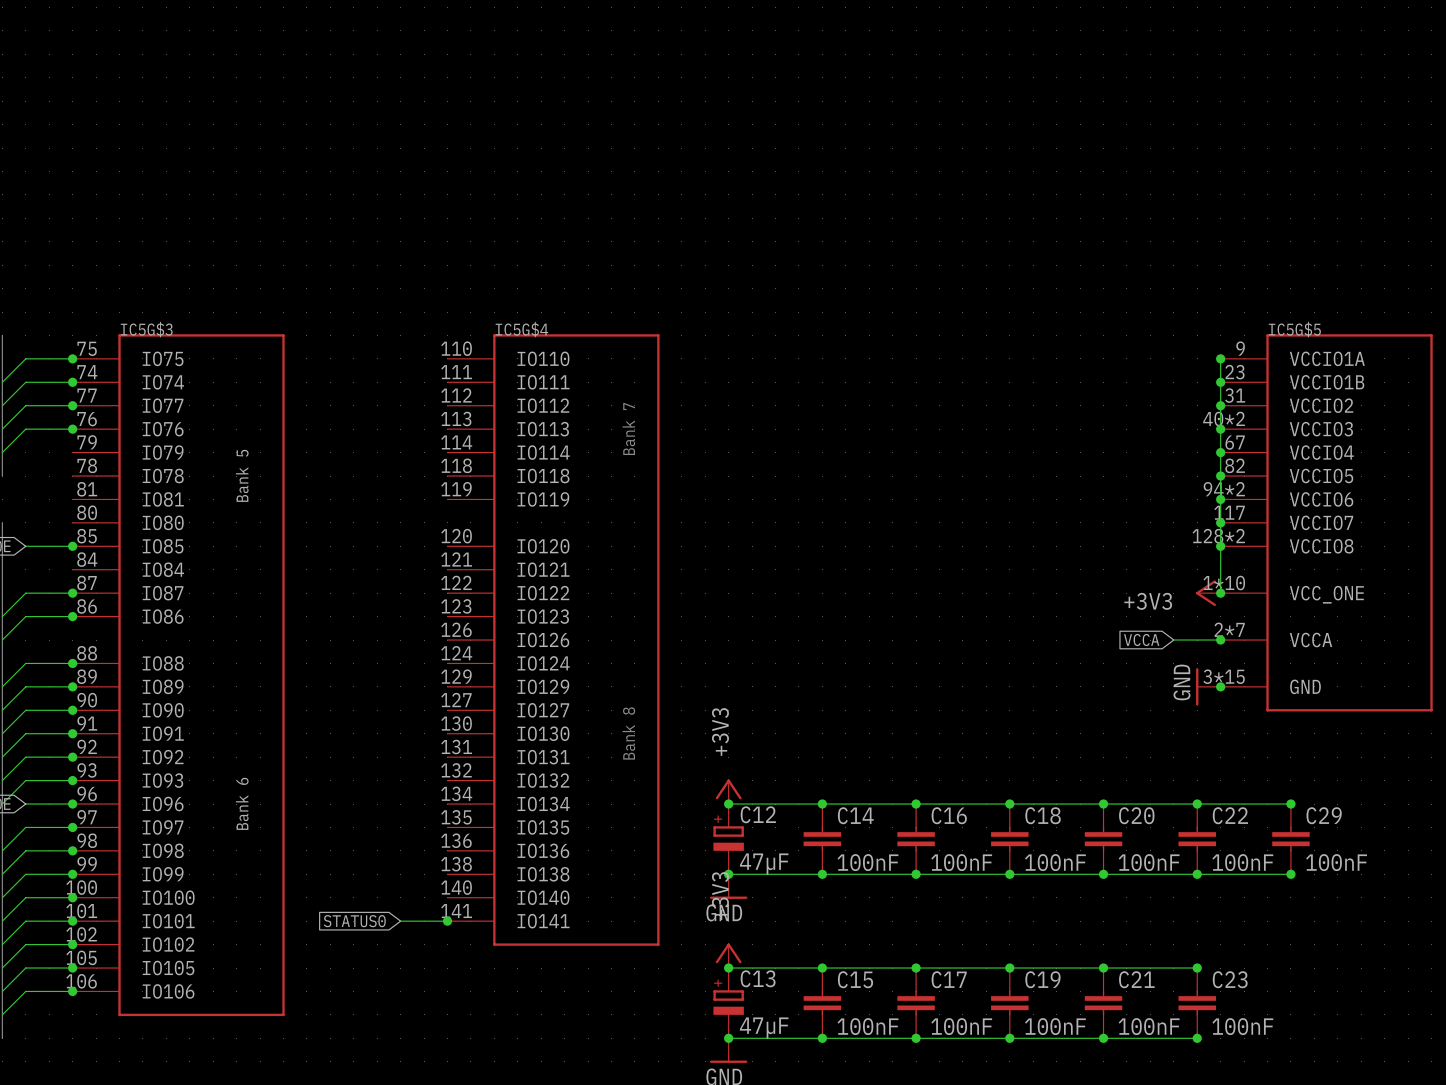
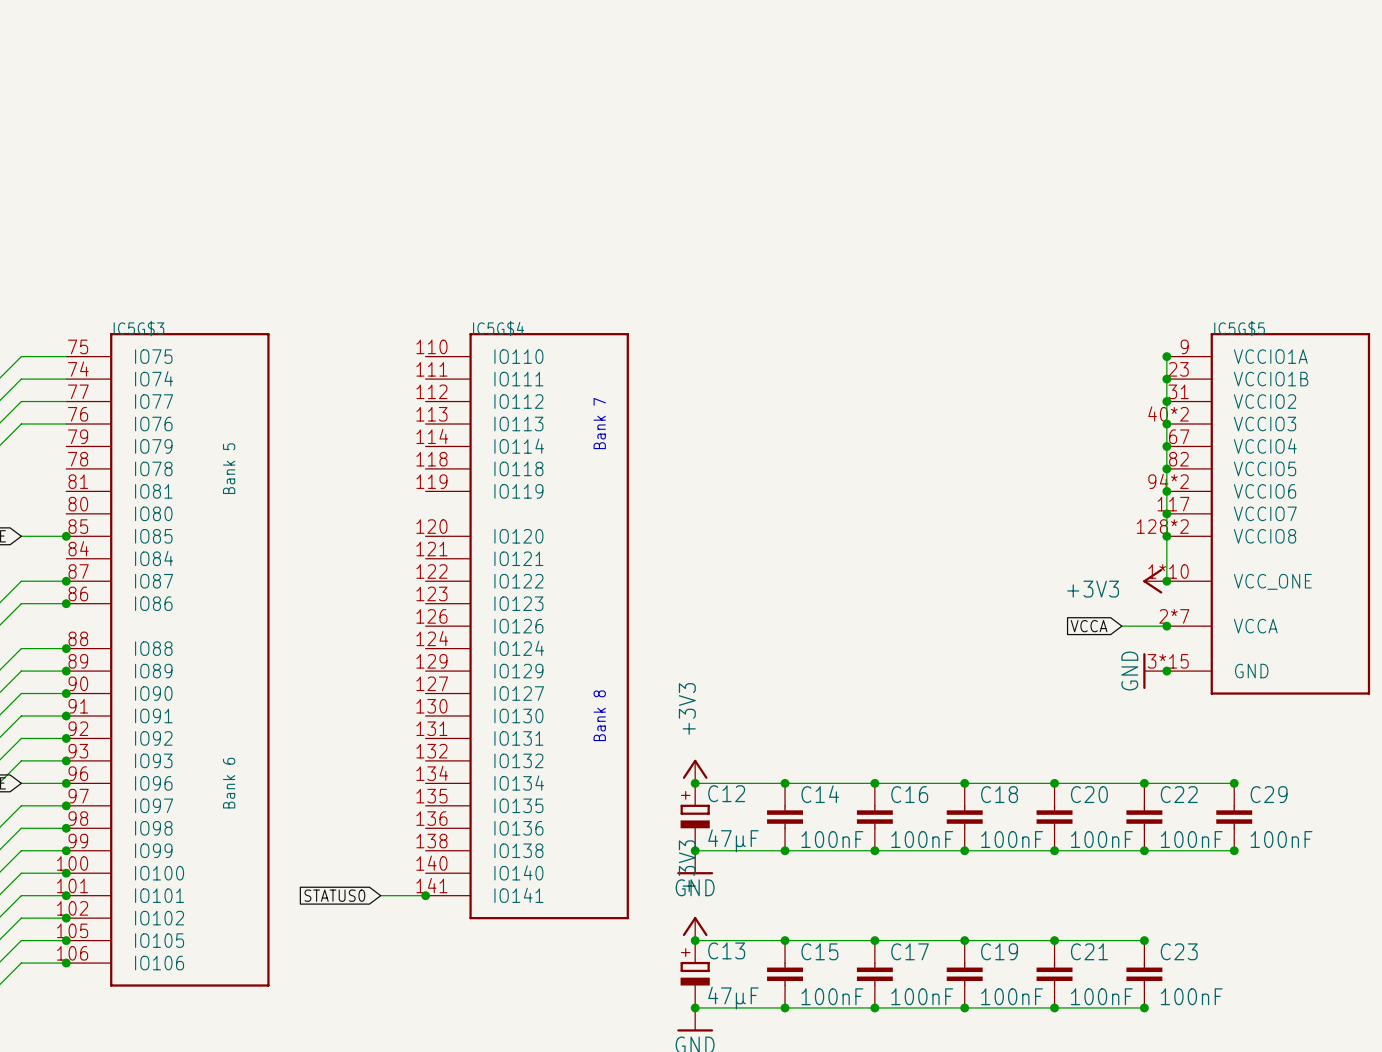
junction: (72, 358) -> none
junction: (72, 382) -> none
junction: (72, 405) -> none
junction: (72, 429) -> none

